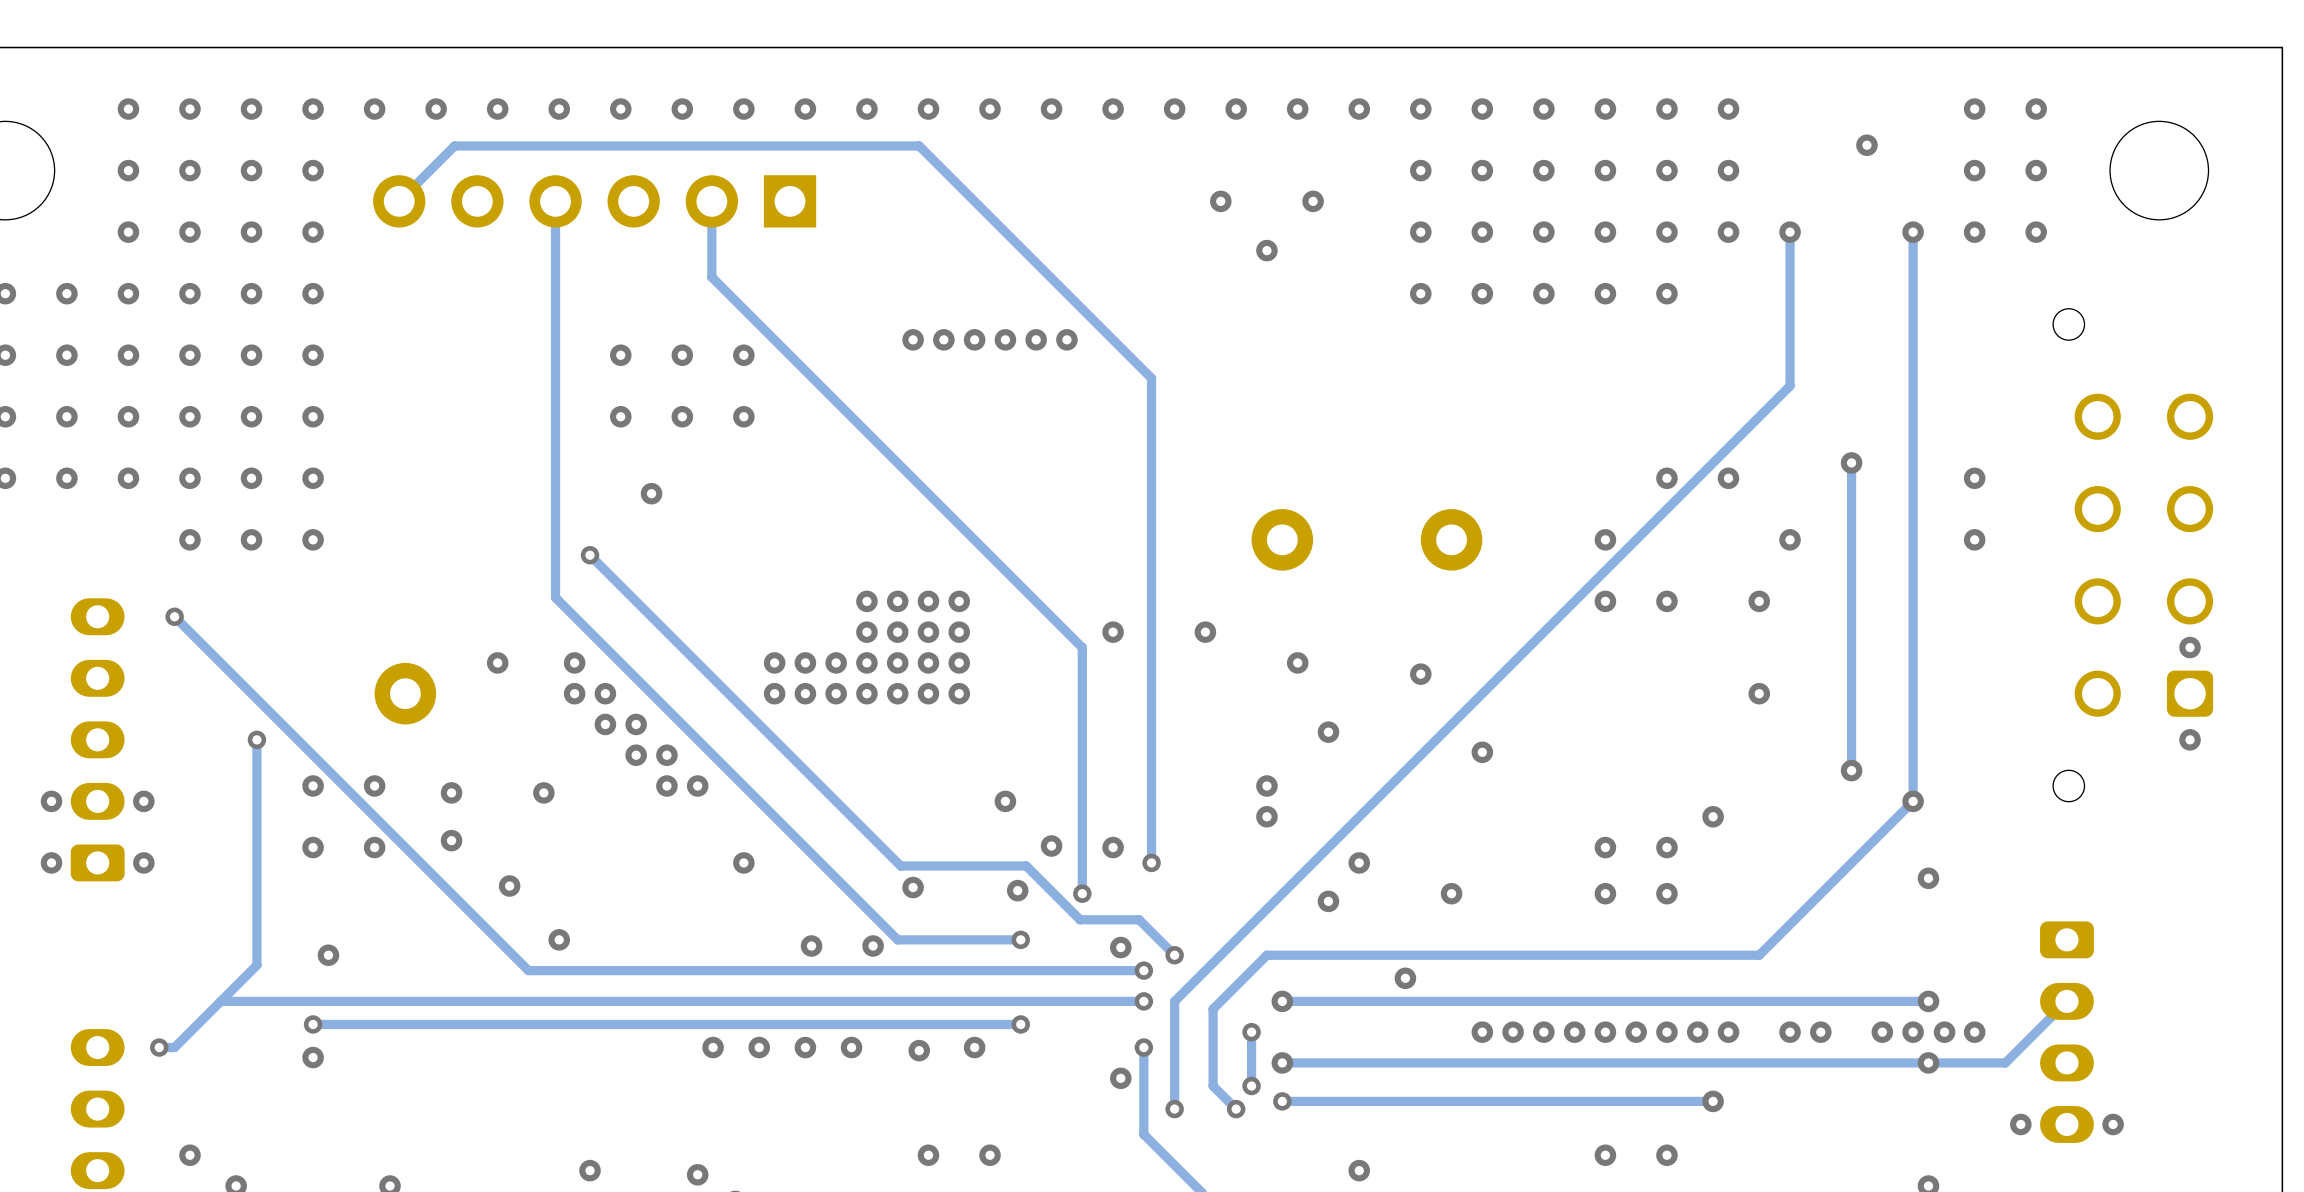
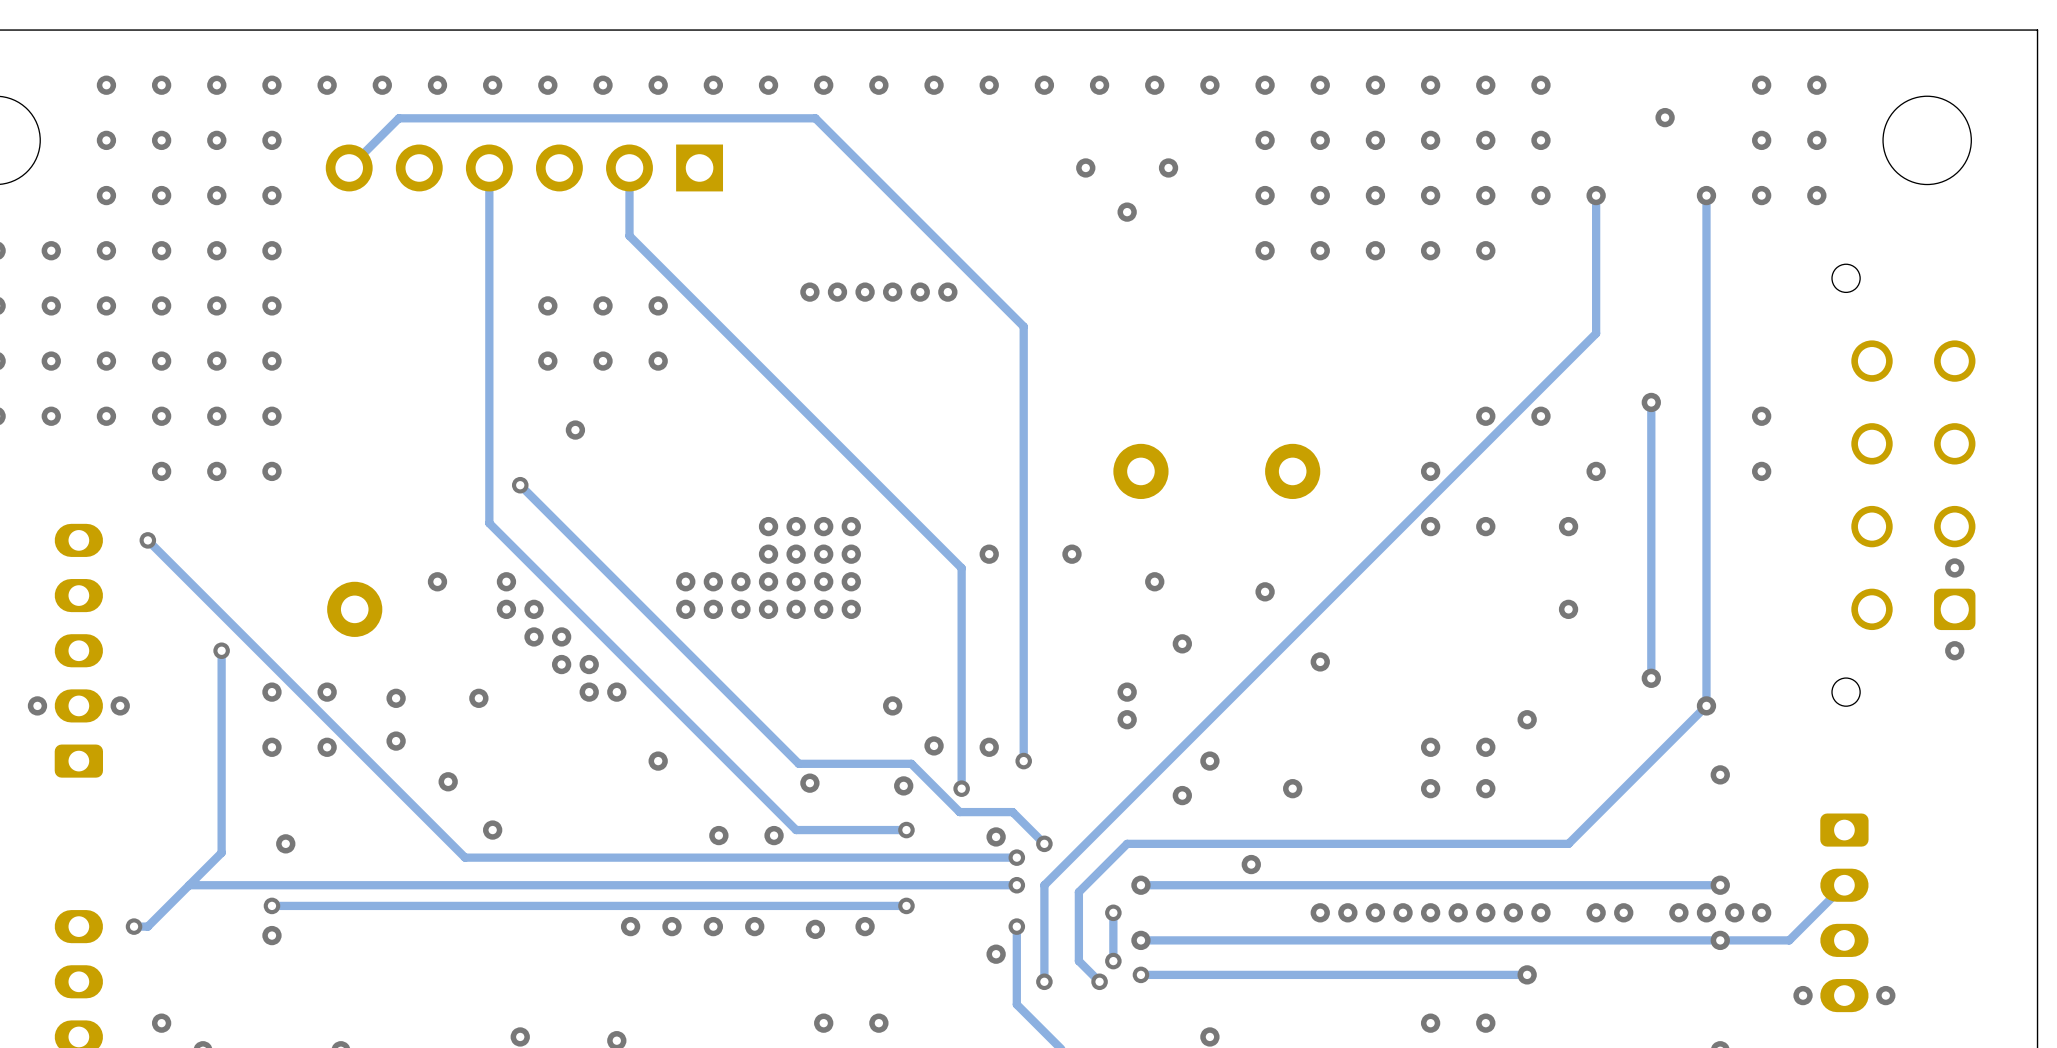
via: (51, 862) -> none
via: (143, 862) -> none

